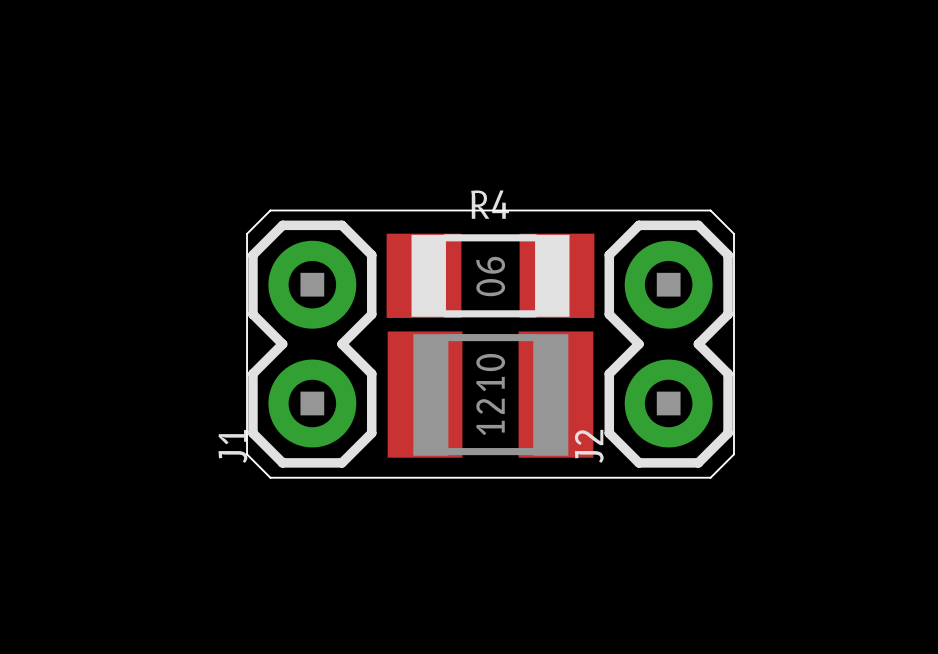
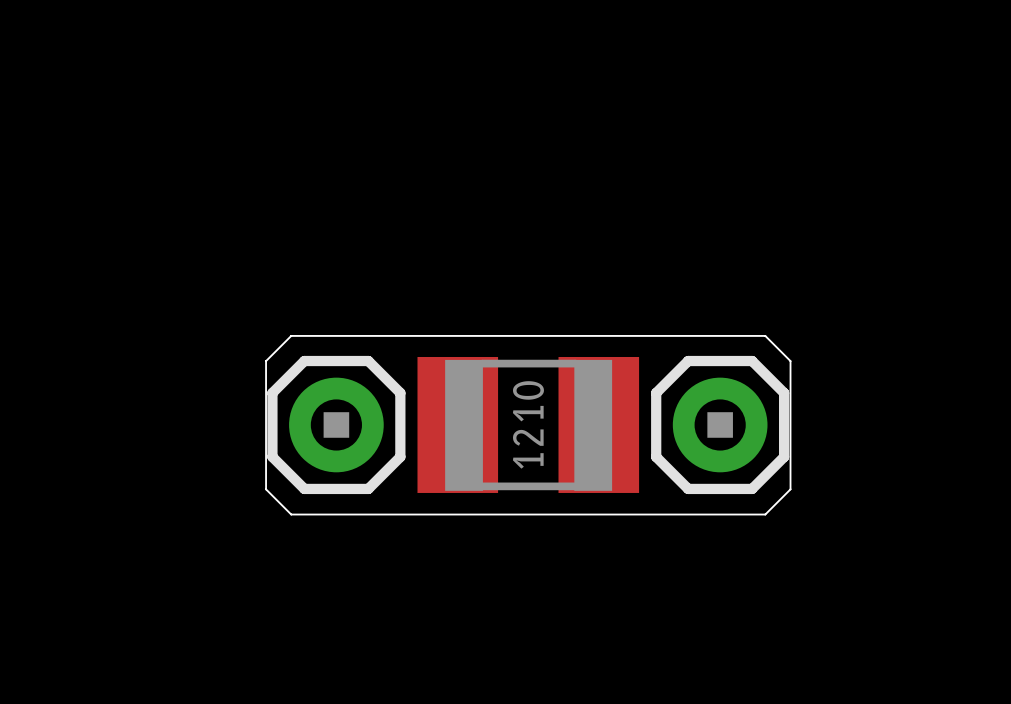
R4: (490, 275) -> none
text: 06 (490, 276) -> none
board edge: (247, 335) (247, 233) (270, 210) (710, 210) (733, 233) (733, 335) -> (266, 361) (291, 335) (765, 335) (790, 361)
J1: (312, 344) -> none
J2: (668, 344) -> none
part: none -> (336, 424)
part: none -> (720, 424)

